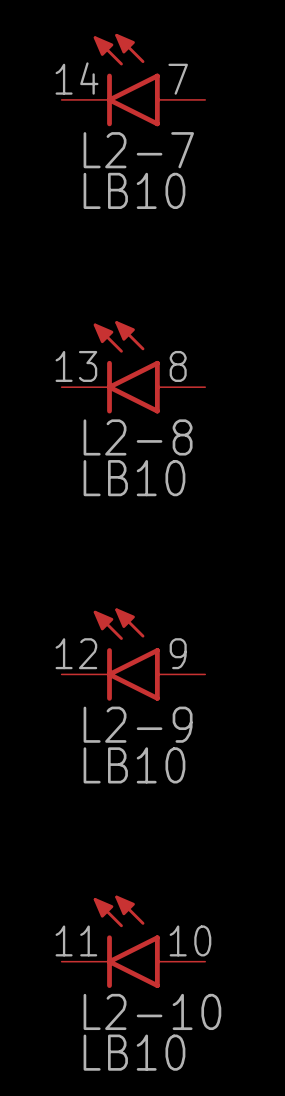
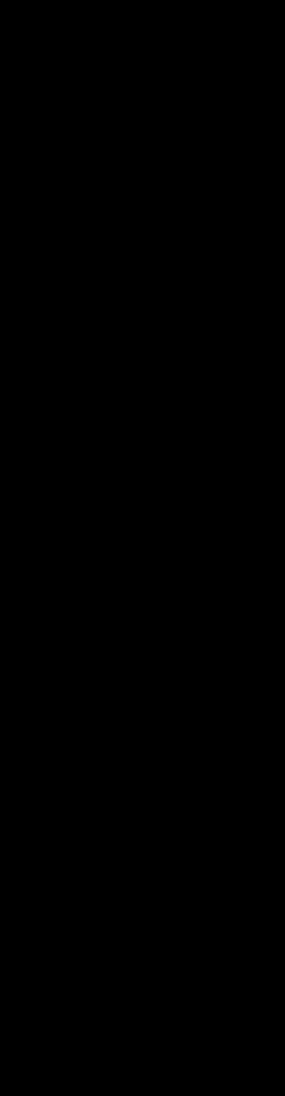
L2-7: LB10 (133, 80) -> none
L2-8: LB10 (133, 367) -> none
L2-9: LB10 (133, 654) -> none
L2-10: LB10 (133, 941) -> none

